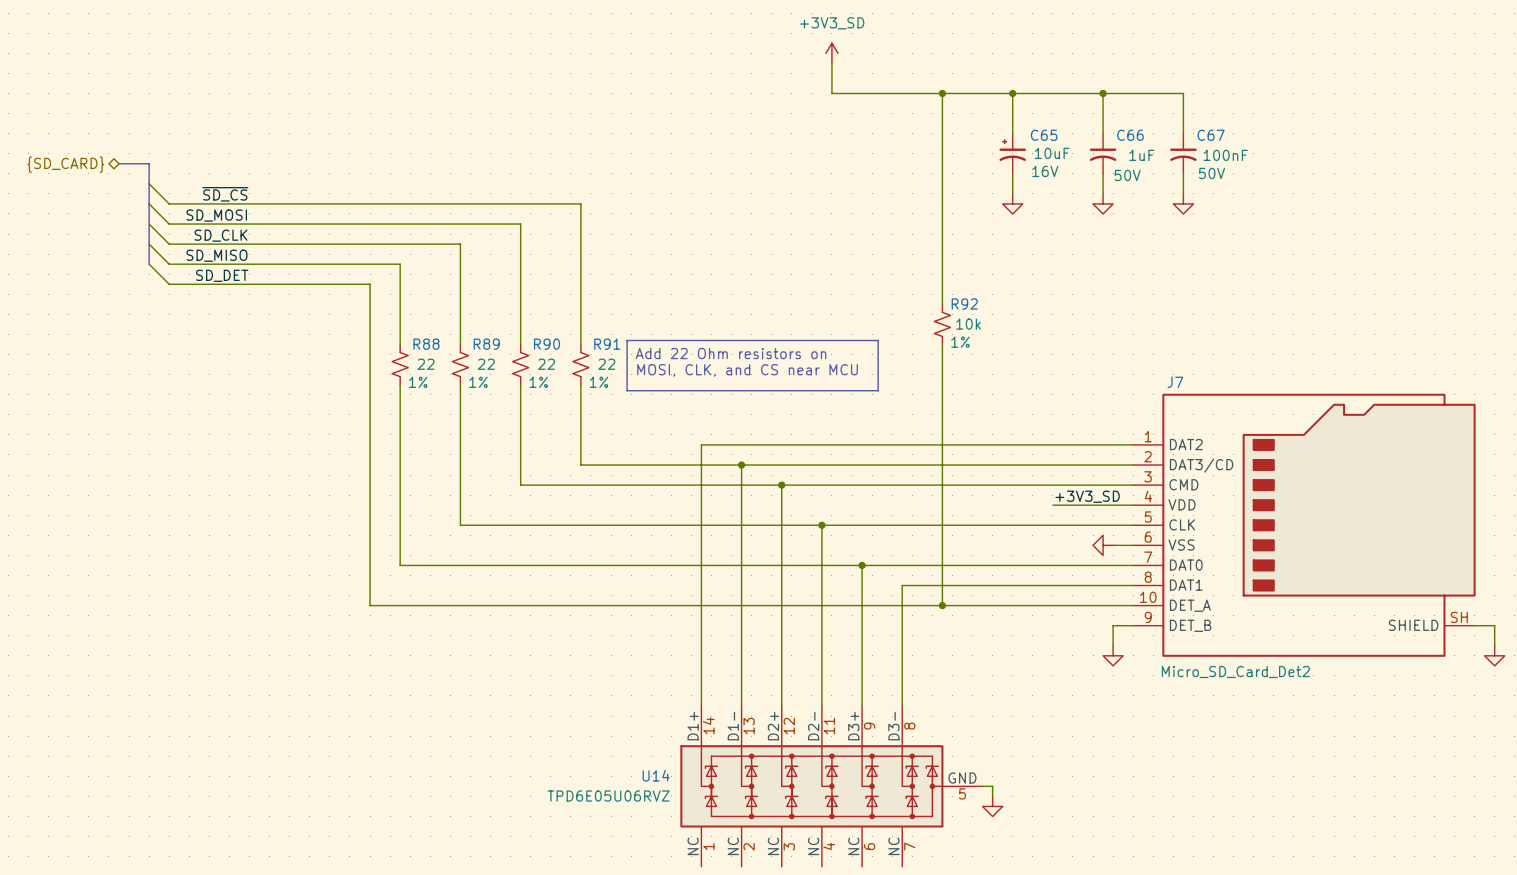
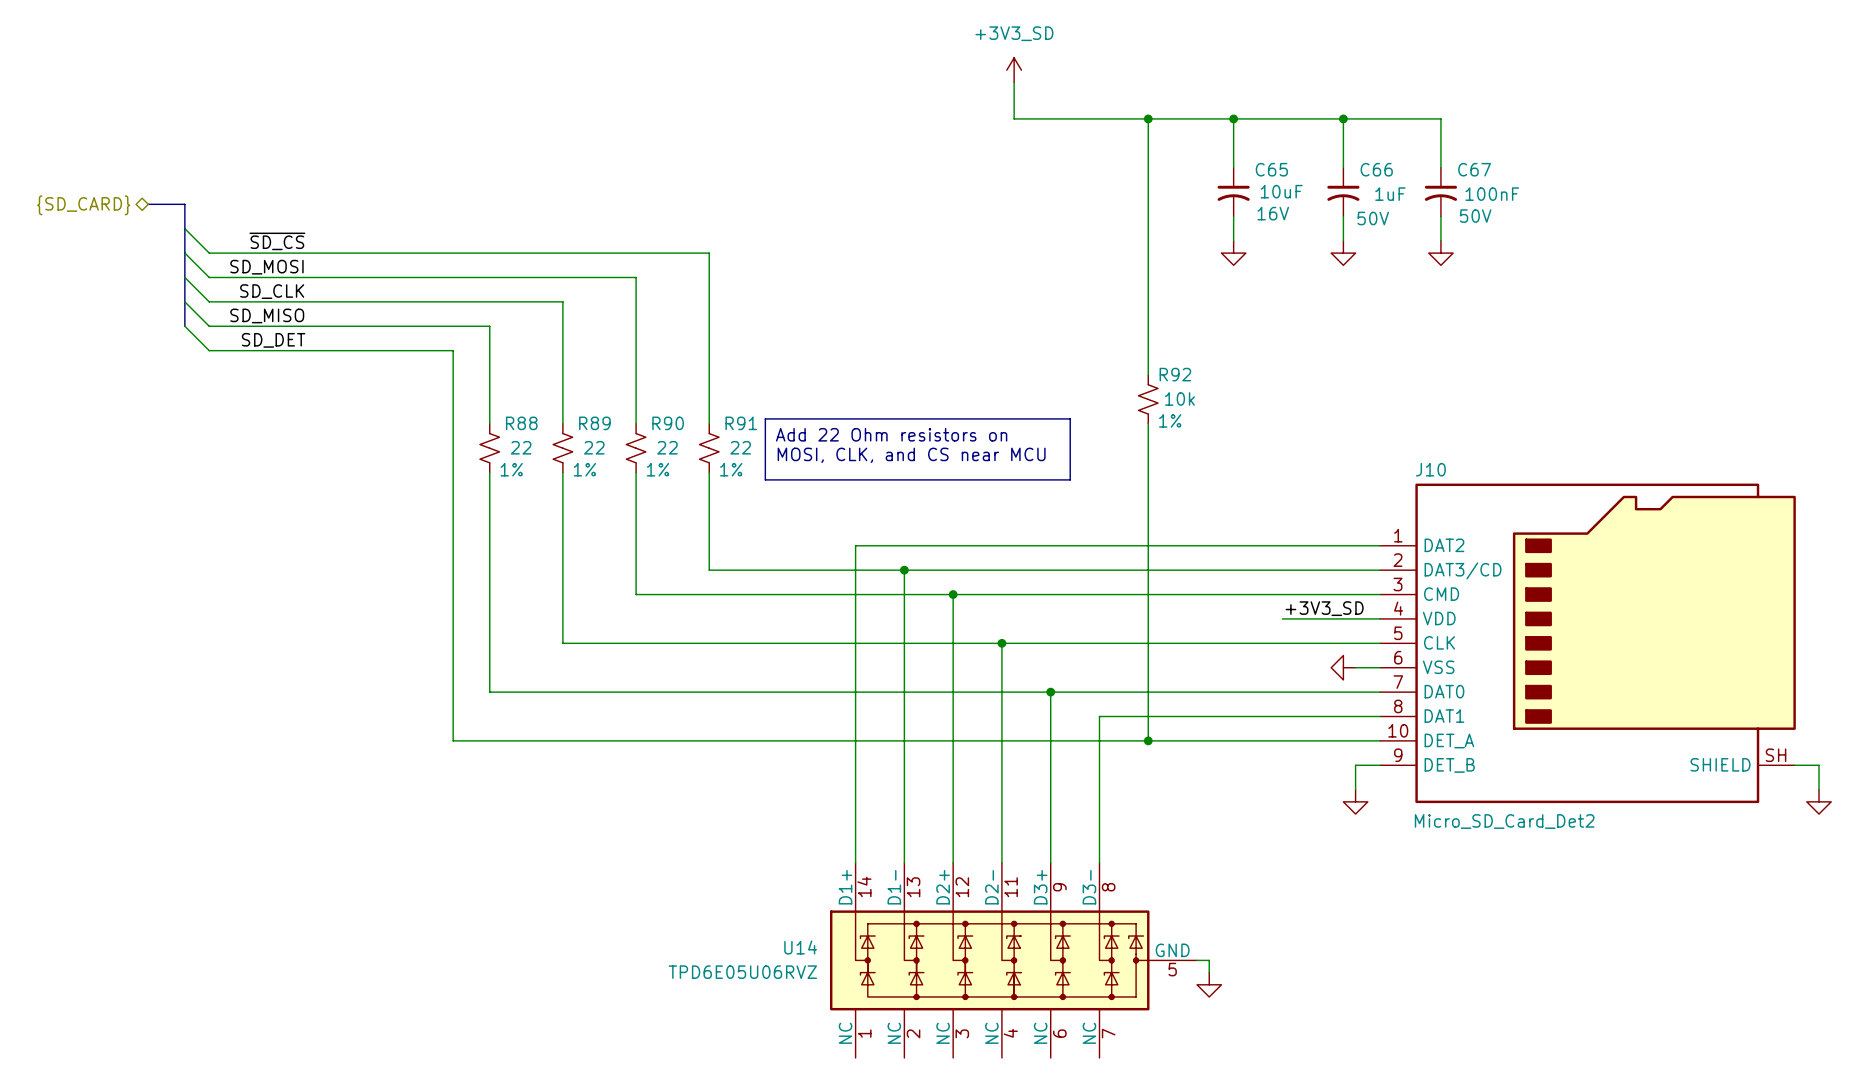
C65 symbol: [999, 133, 1026, 174] -> [1217, 167, 1250, 217]
J7 name: J7 (1175, 382) -> J10 (1430, 469)

